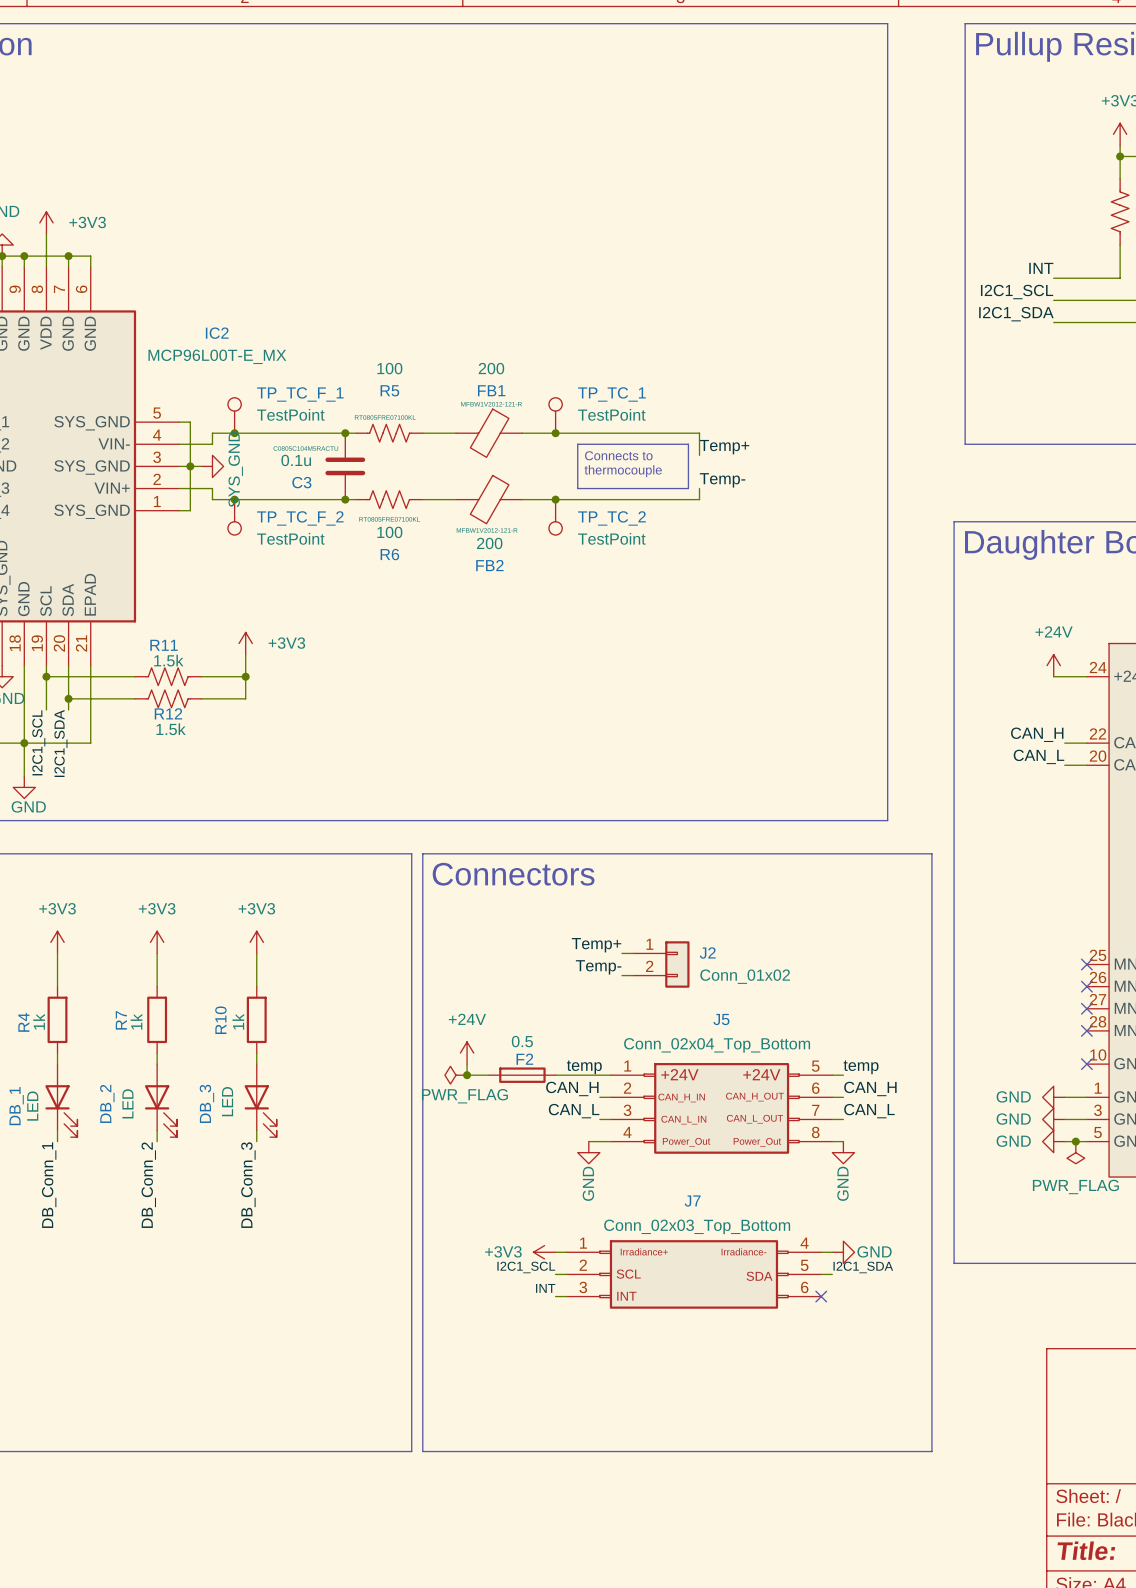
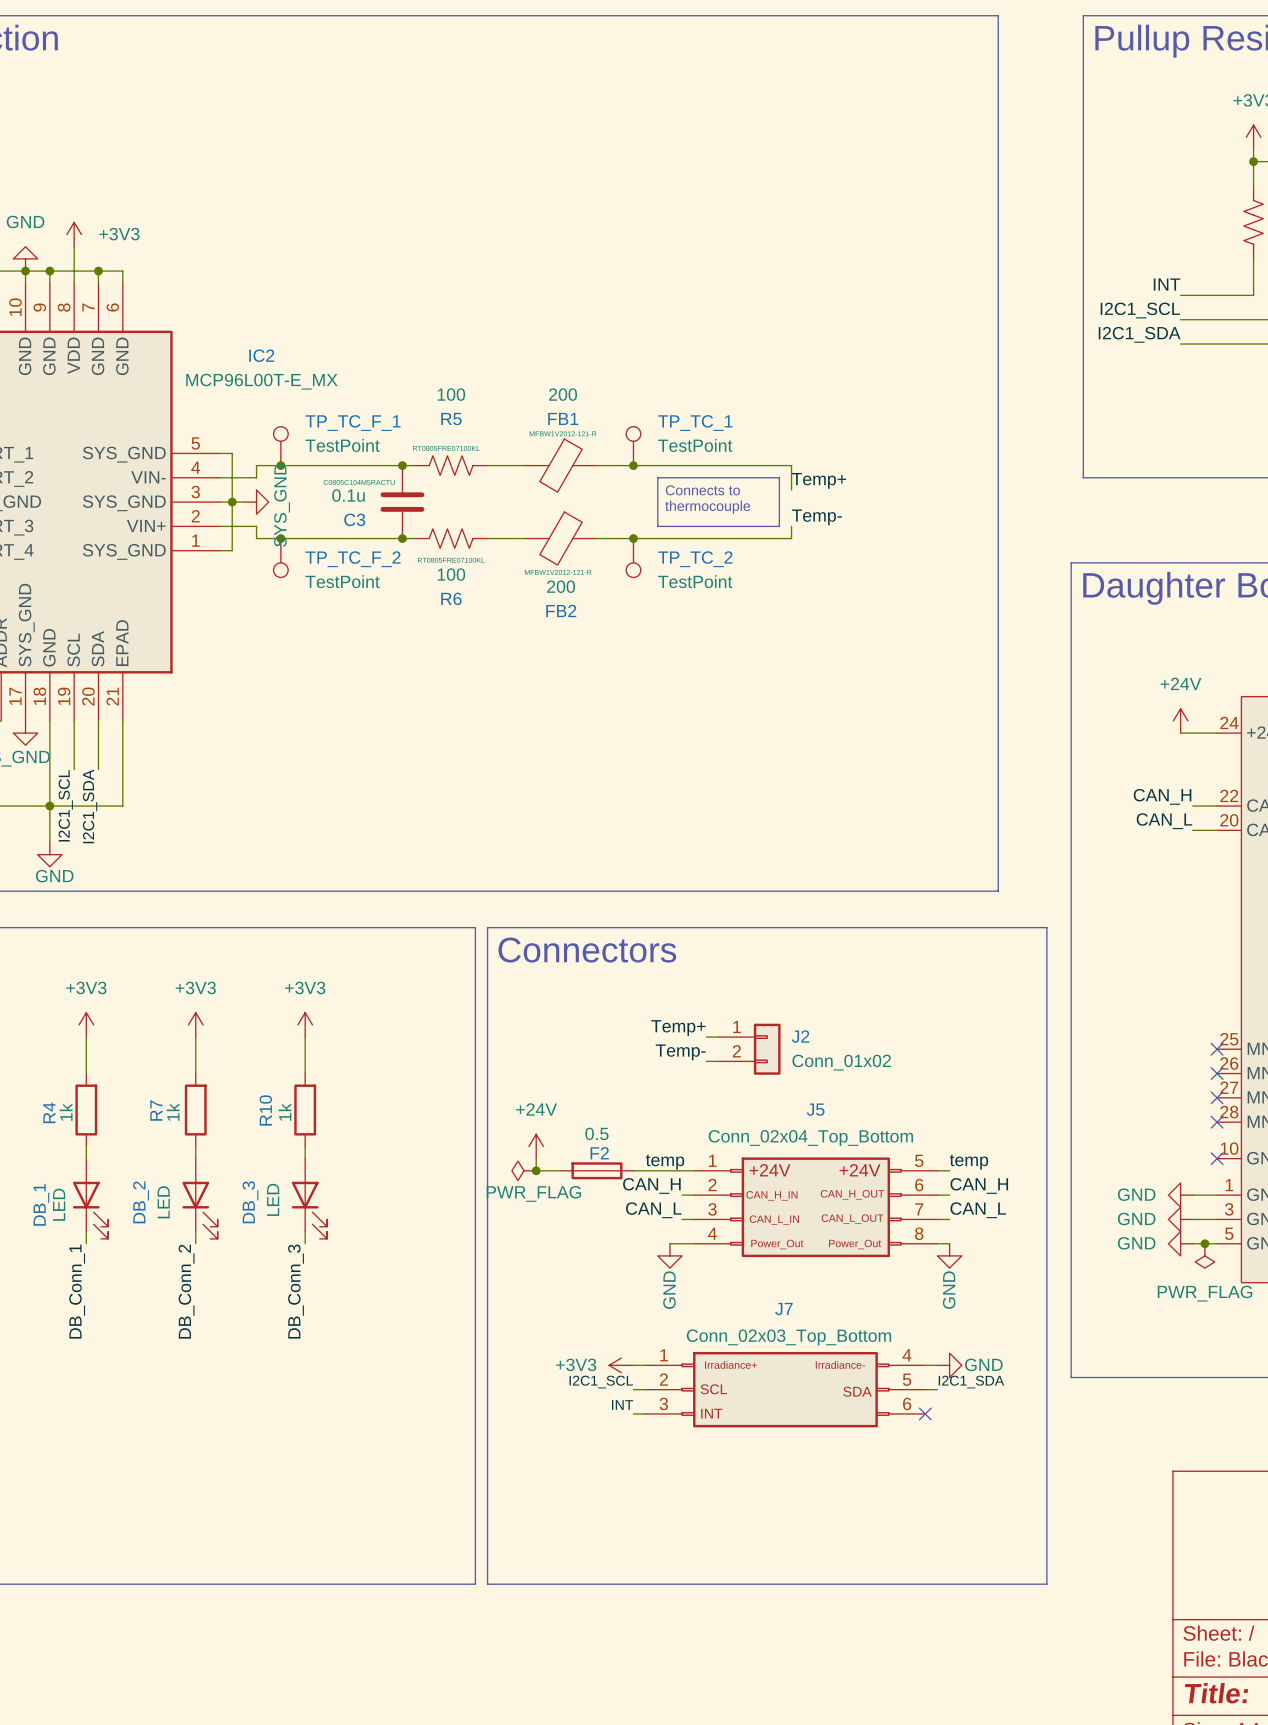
power symbol: +3V3 (245, 643) -> none
wire: (245, 654) (245, 698) (201, 698) -> none
wire: (46, 676) (134, 676) -> none
junction: (46, 676) -> none
R11: 1.5k (168, 676) -> none
wire: (201, 676) (245, 676) -> none
junction: (245, 676) -> none
wire: (68, 698) (134, 698) -> none
junction: (68, 698) -> none
R12: 1.5k (168, 698) -> none

